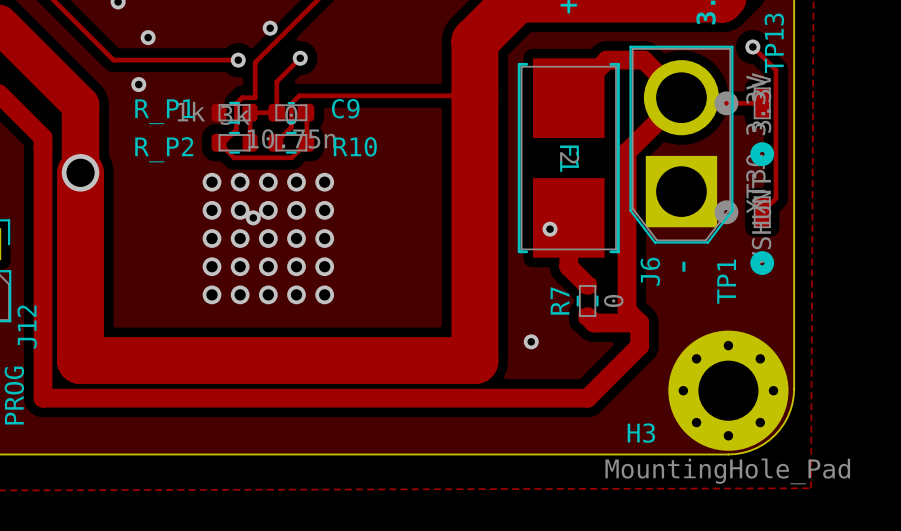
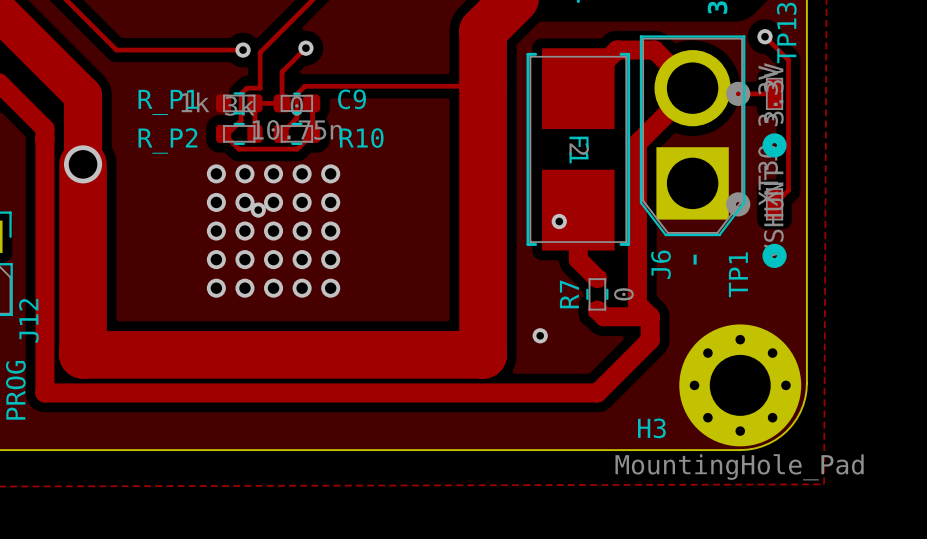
via: (270, 28) -> none
via: (148, 37) -> none
via: (138, 84) -> none

